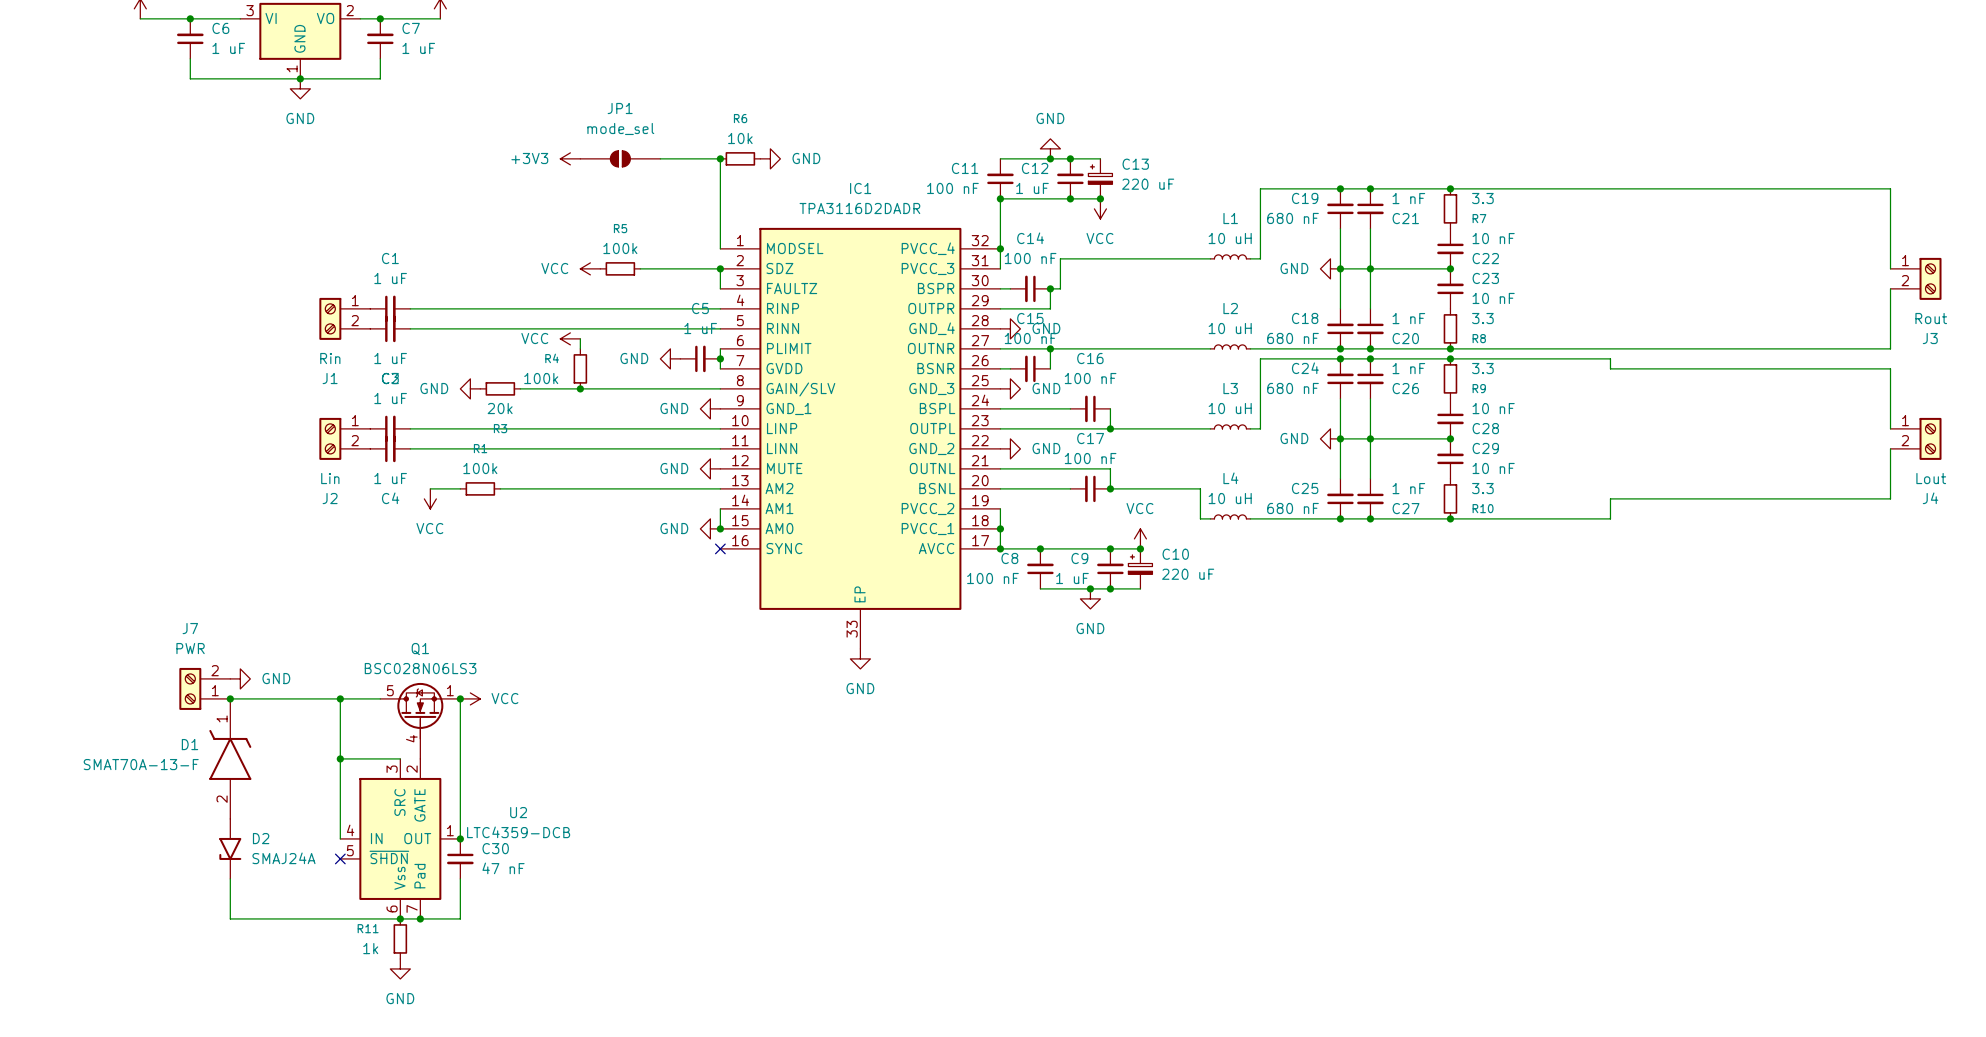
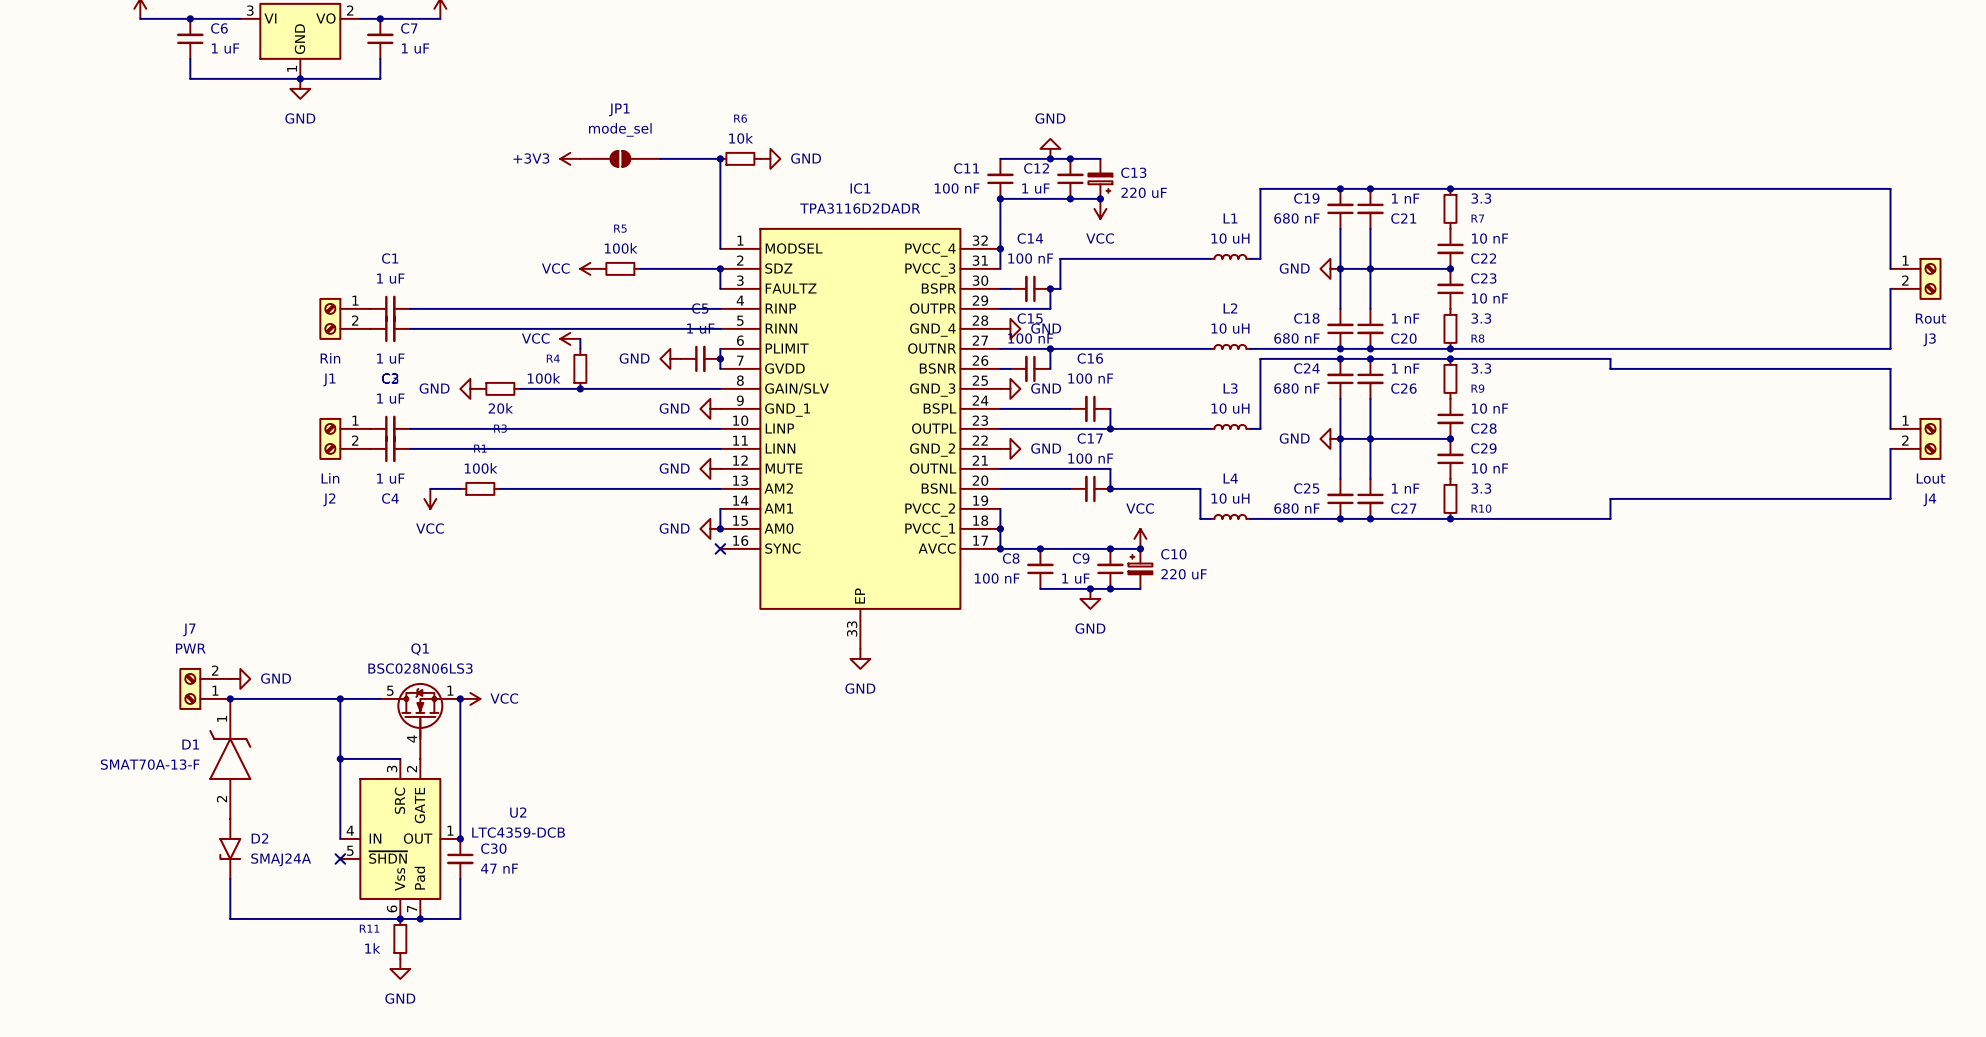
C13 rotation: 0° (1100, 174) -> 180° (1100, 183)

